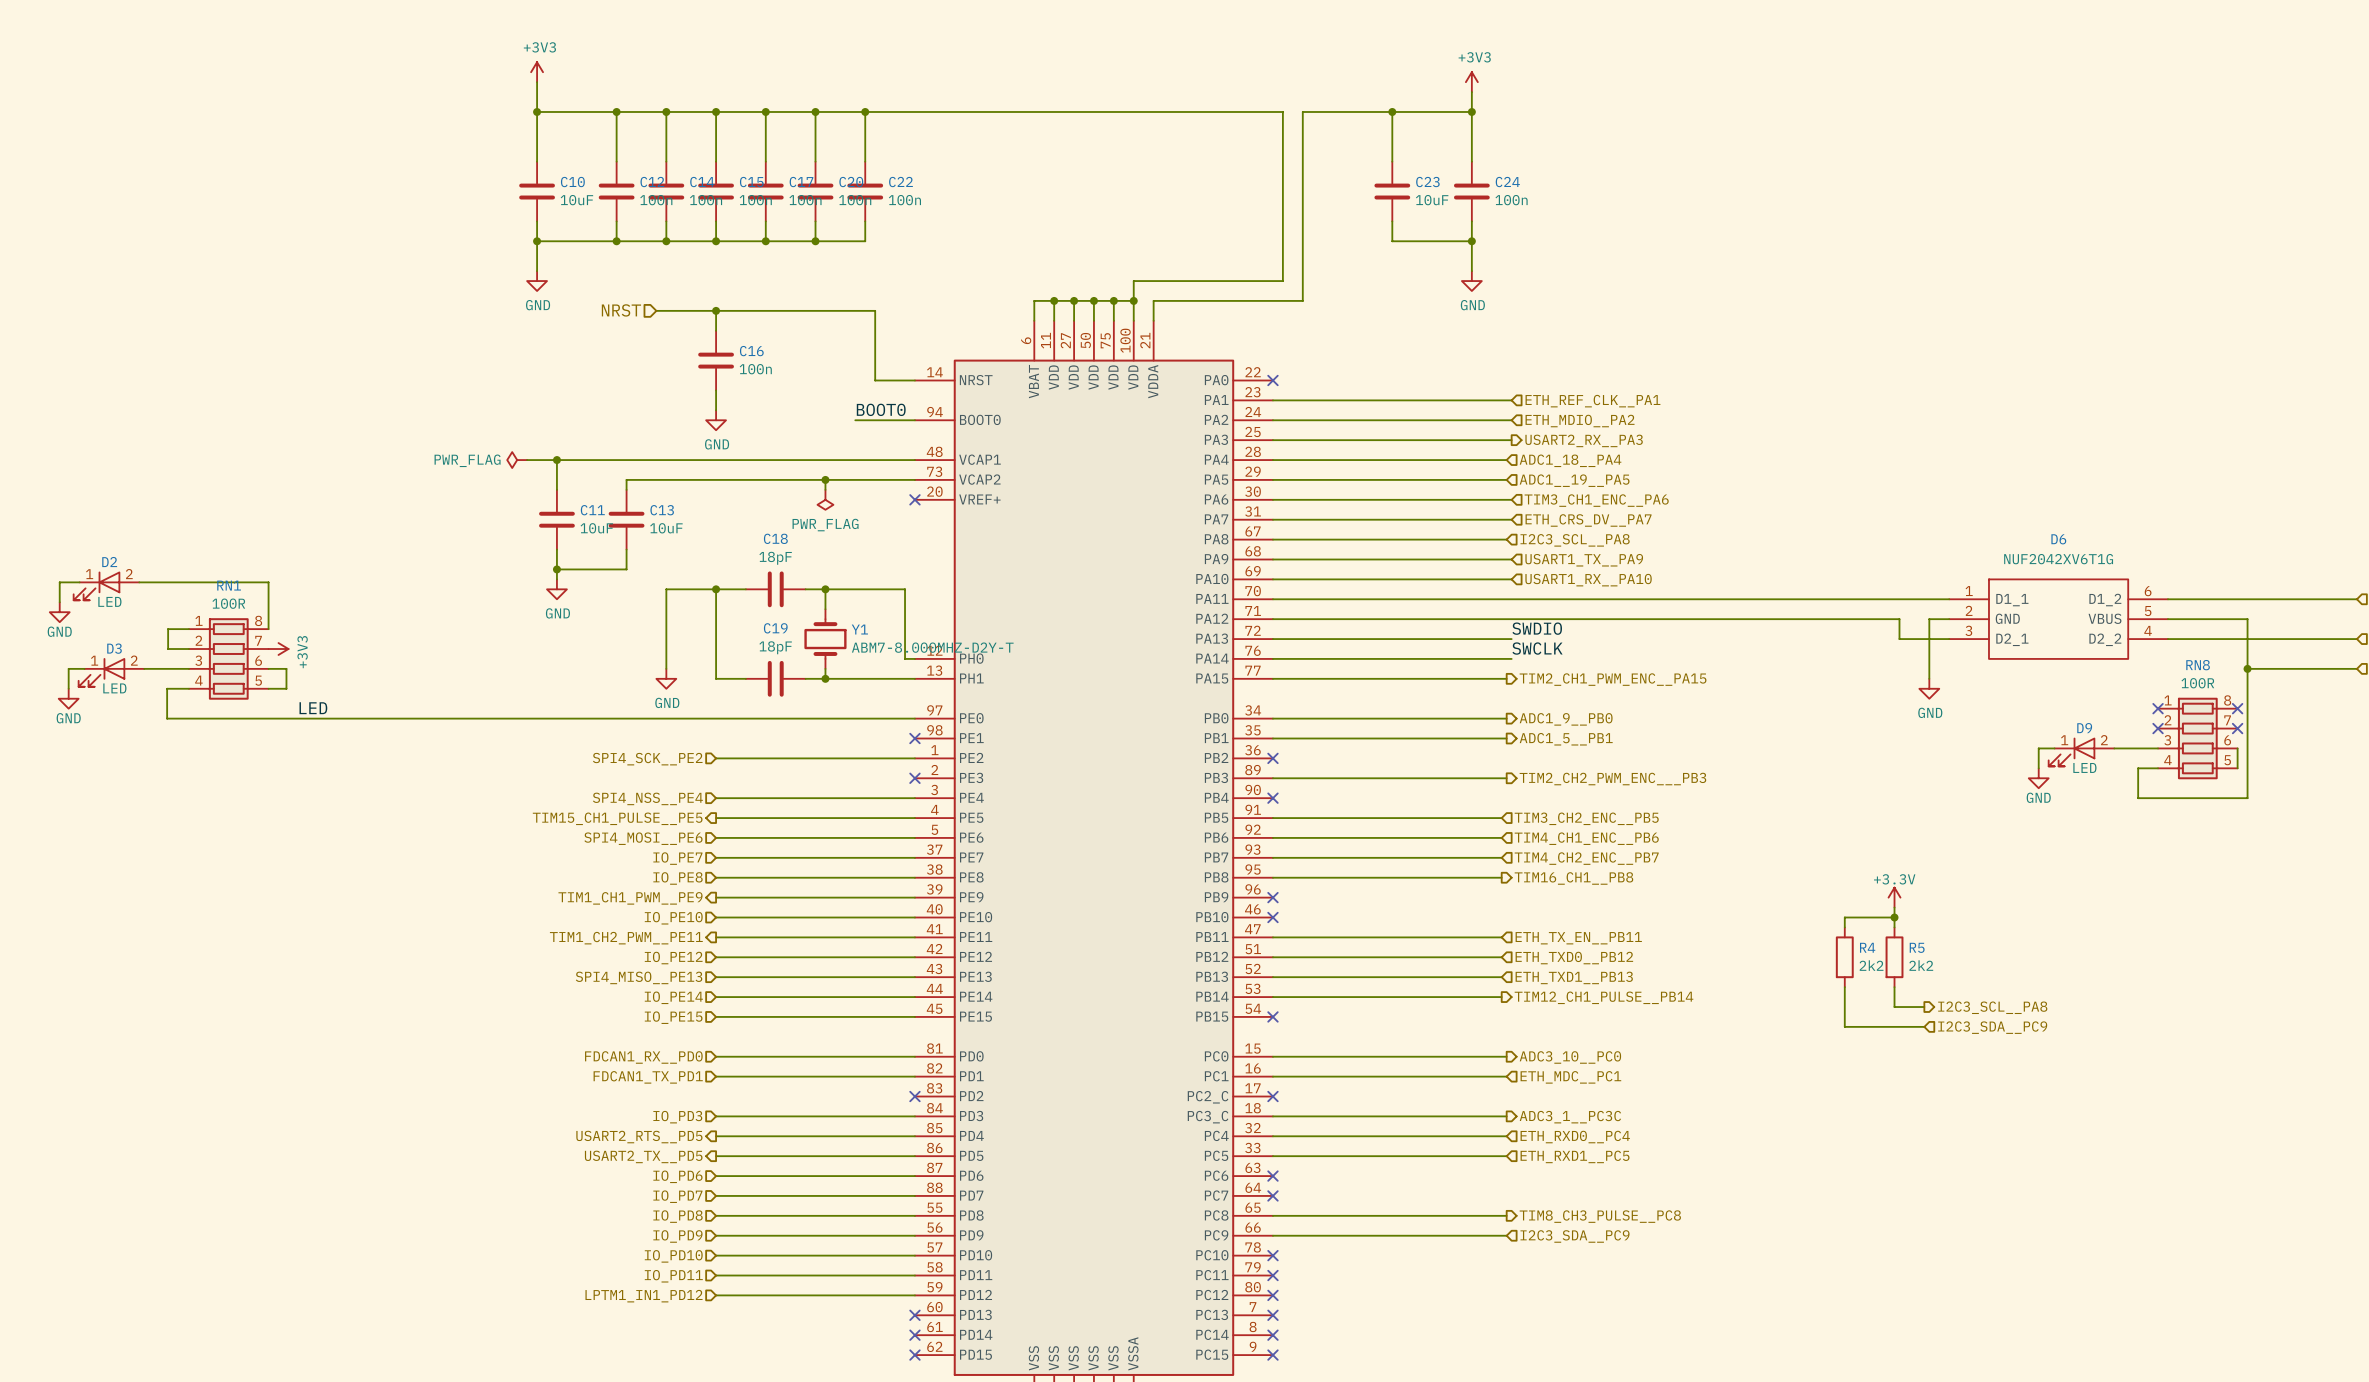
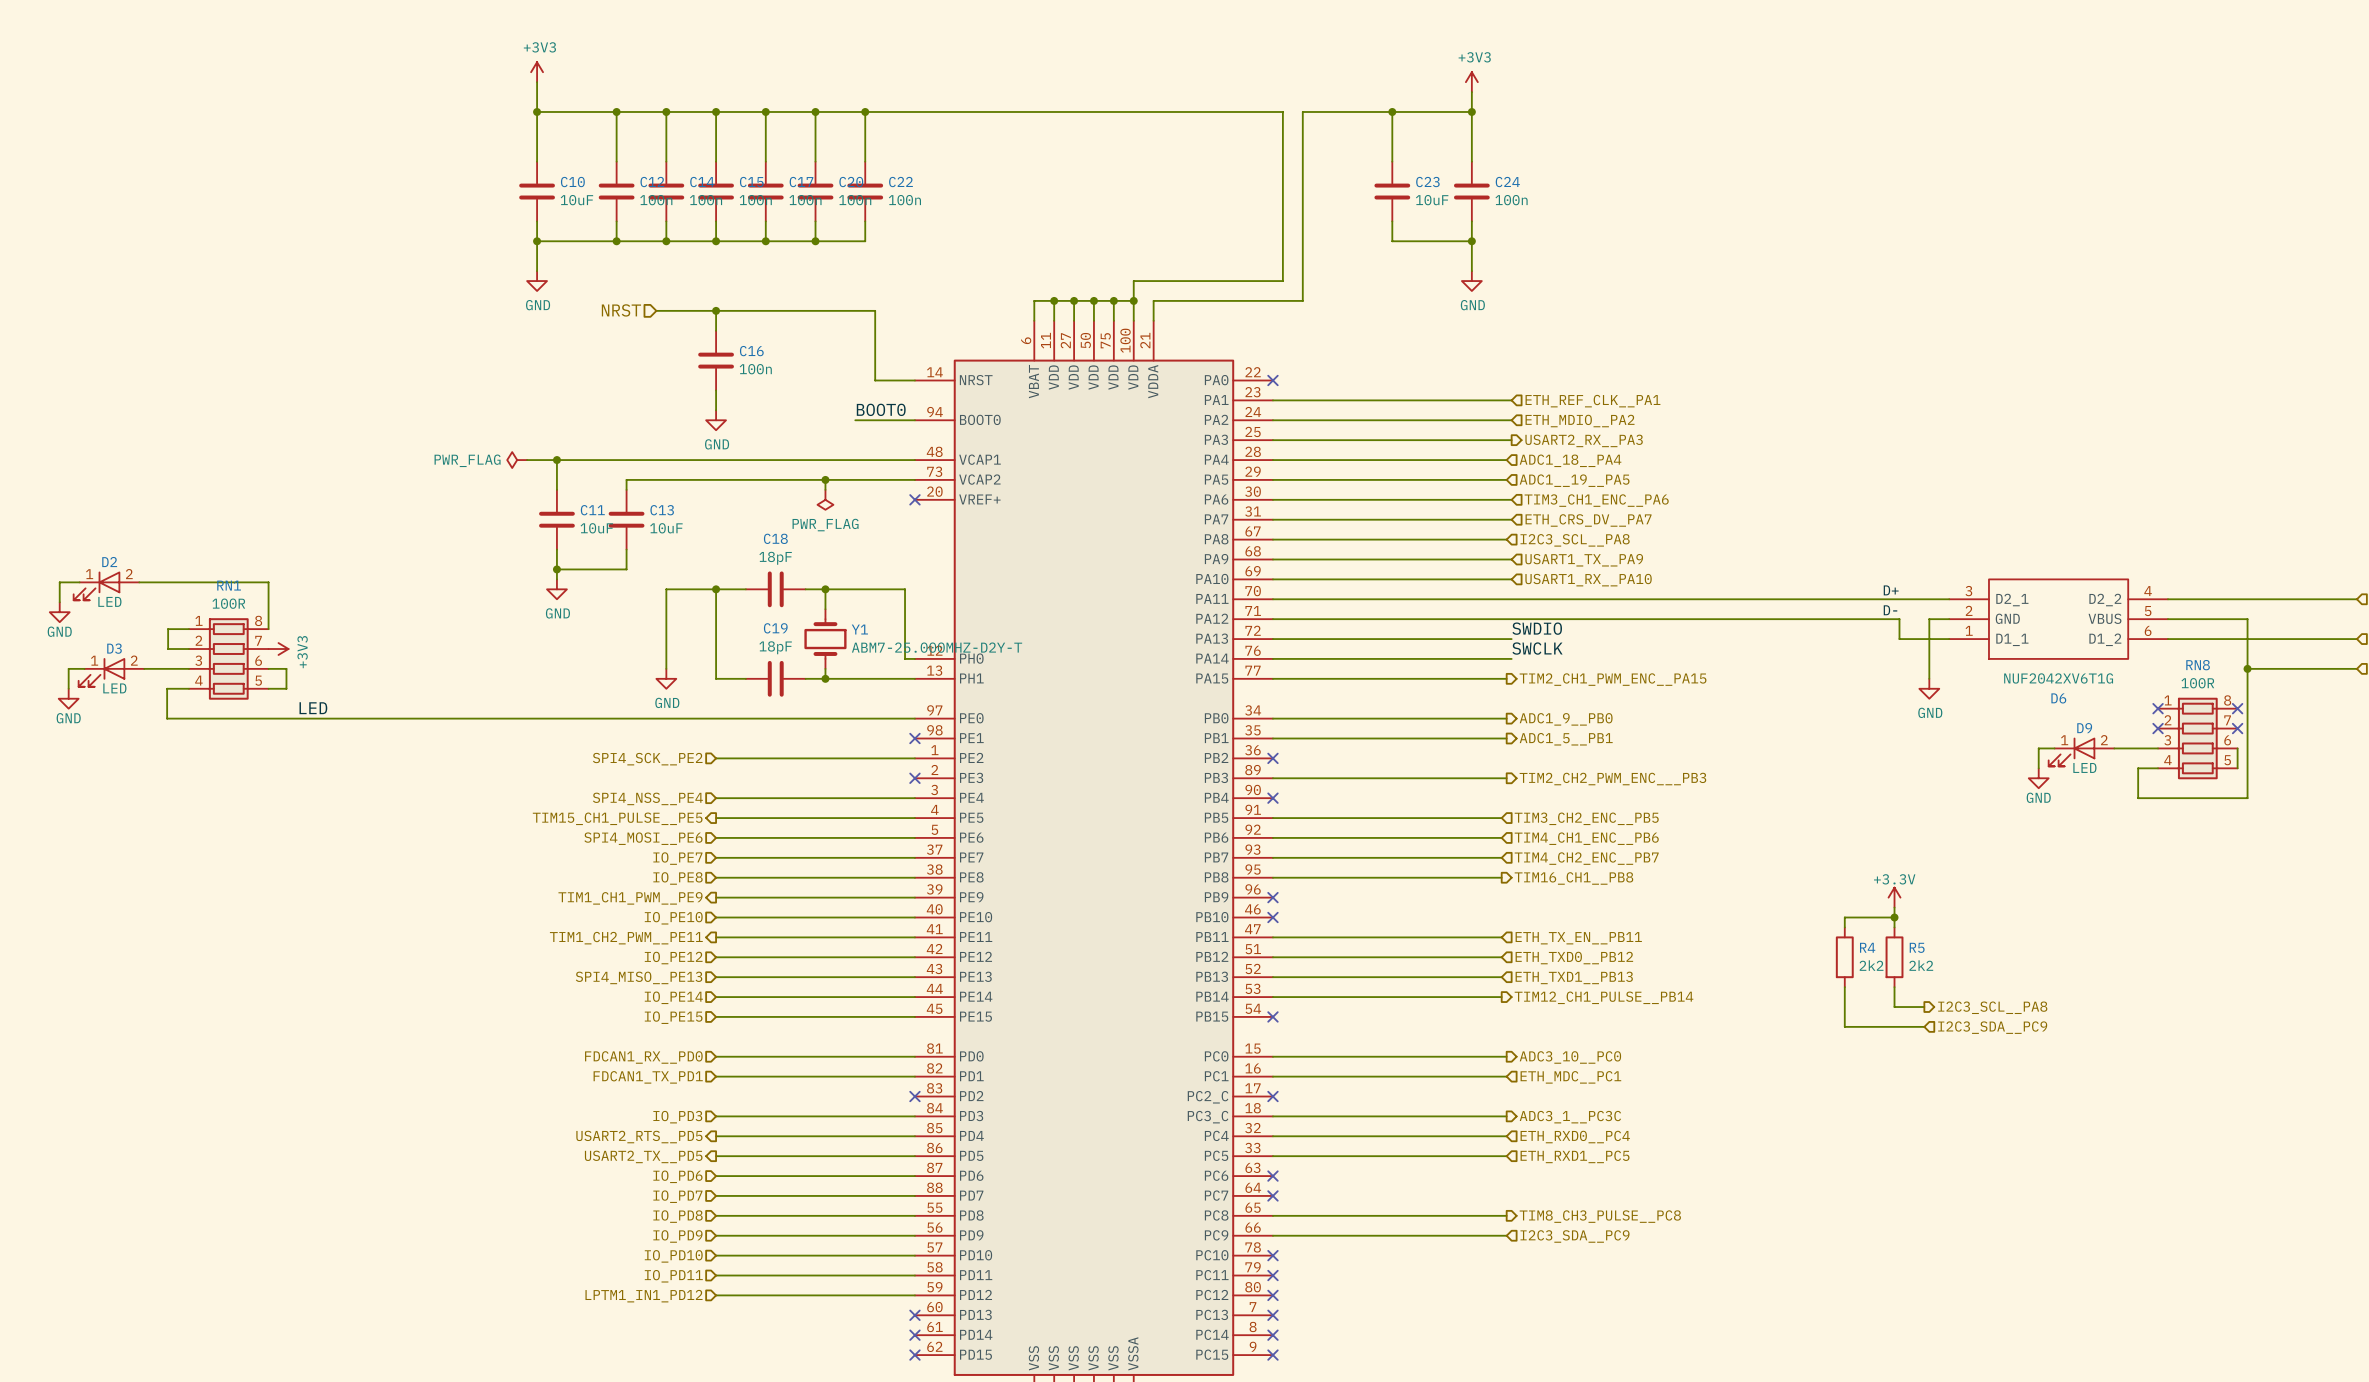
label: none -> D+ (1891, 590)
label: none -> D- (1890, 610)
D6 flip: as is (2058, 619) -> up-down (2058, 619)
Y1 value: ABM7-8.000MHZ-D2Y-T (932, 647) -> ABM7-25.000MHZ-D2Y-T (937, 647)

